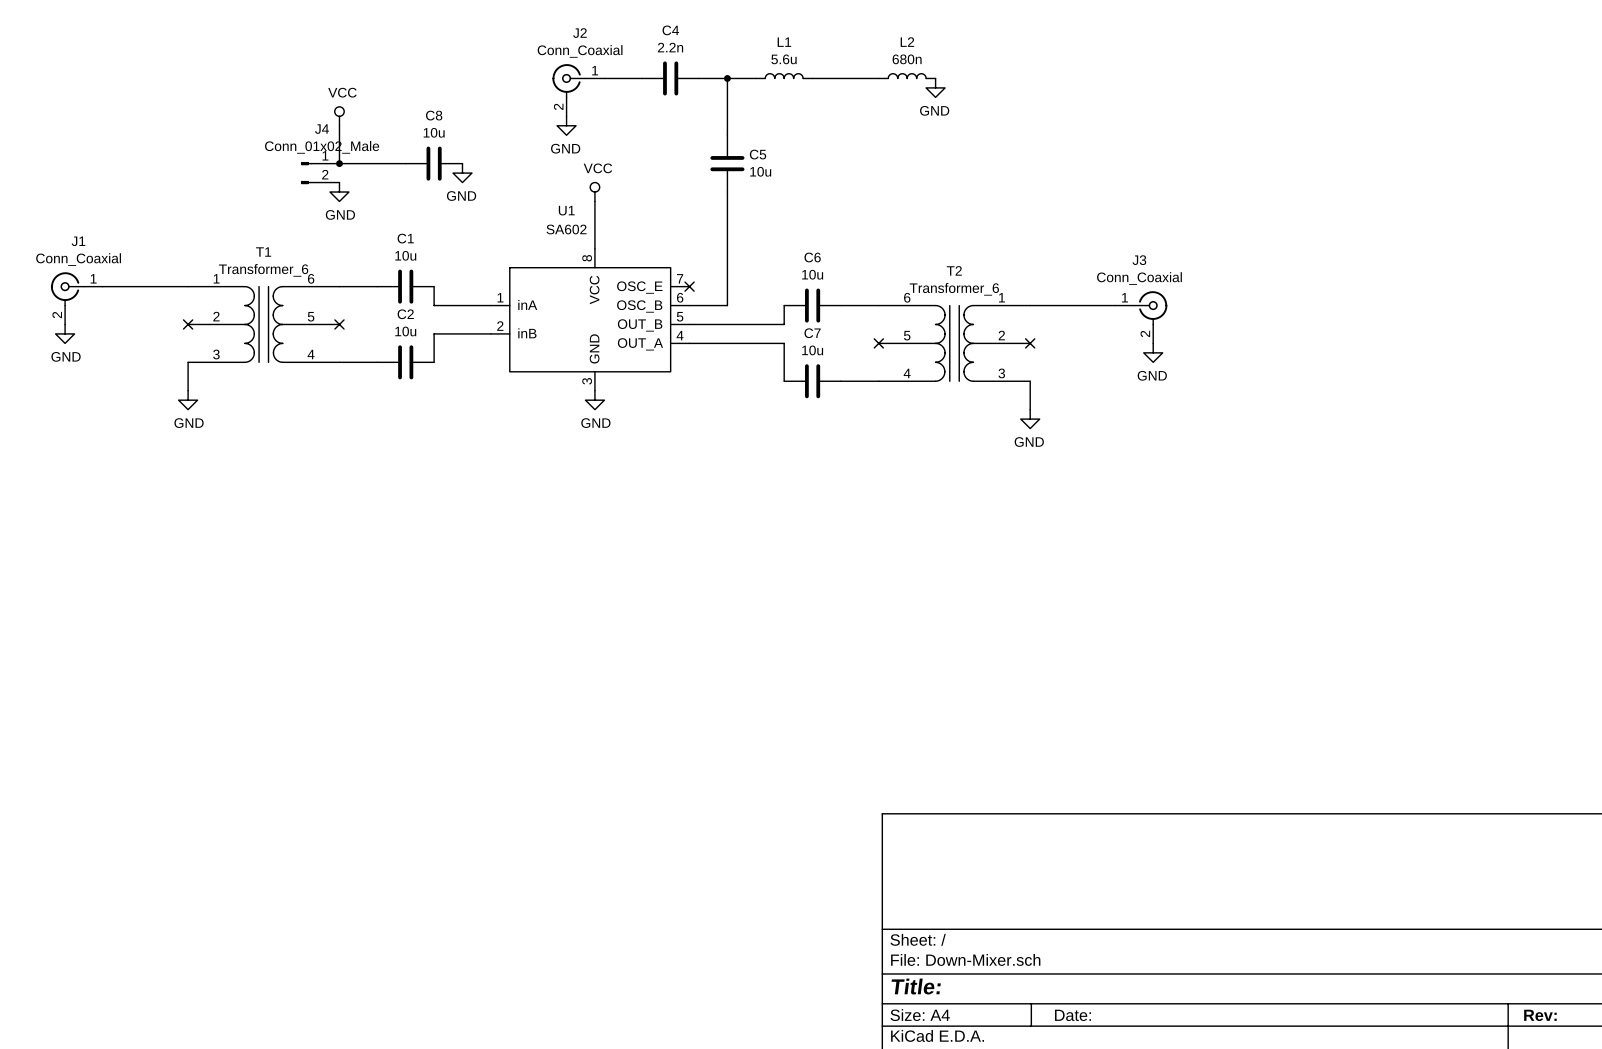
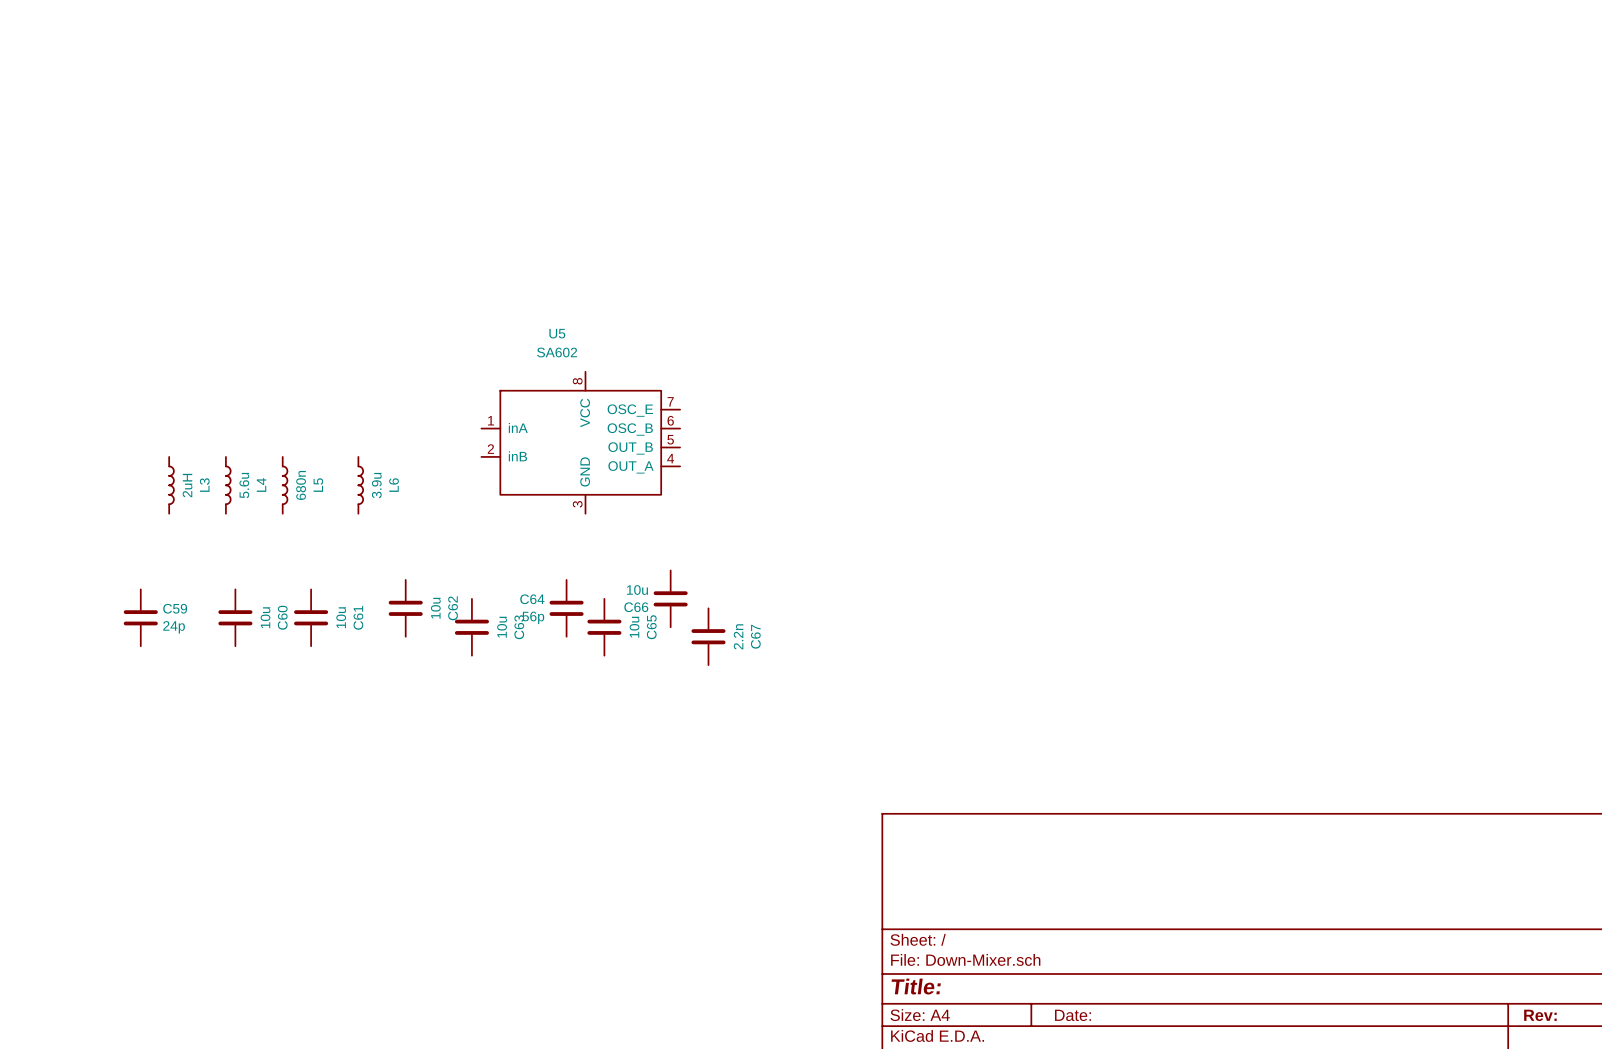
L1: 5.6u (784, 76) -> none
L2: 680n (907, 76) -> none
wire: (604, 78) (642, 78) -> none
C4: 2.2n (670, 78) -> none
wire: (699, 78) (755, 78) -> none
wire: (727, 78) (727, 135) -> none
junction: (727, 78) -> none
wire: (812, 78) (878, 78) -> none
power symbol: GND (935, 87) -> none
J2: Conn_Coaxial (578, 90) -> none
power symbol: VCC (339, 116) -> none
wire: (339, 125) (339, 163) (405, 163) -> none
power symbol: GND (566, 125) -> none
junction: (339, 163) -> none
C8: 10u (434, 163) -> none
C5: 10u (727, 163) -> none
J4: Conn_01x02_Male (320, 173) -> none
power symbol: GND (462, 173) -> none
power symbol: GND (339, 192) -> none
power symbol: VCC (594, 192) -> none
wire: (727, 192) (727, 305) (689, 305) -> none
wire: (594, 201) (594, 248) -> none
wire: (102, 286) (188, 286) -> none
wire: (339, 286) (377, 286) -> none
C1: 10u (405, 286) -> none
wire: (434, 286) (434, 305) (490, 305) -> none
no-connect mark: (689, 286) -> none
J1: Conn_Coaxial (76, 298) -> none
wire: (784, 305) (784, 324) (689, 324) -> none
C6: 10u (812, 305) -> none
wire: (840, 305) (878, 305) -> none
wire: (1030, 305) (1115, 305) -> none
J3: Conn_Coaxial (1141, 317) -> none
U1: SA602 (590, 319) -> none
no-connect mark: (188, 324) -> none
T1: Transformer_6 (263, 324) -> none
no-connect mark: (339, 324) -> none
power symbol: GND (65, 333) -> none
wire: (490, 333) (434, 333) (434, 362) -> none
wire: (689, 343) (784, 343) (784, 381) -> none
no-connect mark: (878, 343) -> none
T2: Transformer_6 (954, 343) -> none
no-connect mark: (1030, 343) -> none
power symbol: GND (1153, 352) -> none
wire: (188, 362) (188, 390) -> none
wire: (339, 362) (377, 362) -> none
C2: 10u (405, 362) -> none
C7: 10u (812, 381) -> none
wire: (840, 381) (878, 381) -> none
wire: (1030, 381) (1030, 409) -> none
power symbol: GND (188, 400) -> none
power symbol: GND (594, 400) -> none
power symbol: GND (1030, 419) -> none
U5: none -> SA602 (580, 442)
L3: none -> 2uH (171, 485)
L4: none -> 5.6u (228, 485)
L5: none -> 680n (285, 485)
L6: none -> 3.9u (360, 485)
C66: none -> 10u (670, 598)
C62: none -> 10u (405, 608)
C64: none -> 56p (566, 608)
C59: none -> 24p (140, 617)
C60: none -> 10u (235, 617)
C61: none -> 10u (311, 617)
C63: none -> 10u (471, 627)
C65: none -> 10u (604, 627)
C67: none -> 2.2n (708, 636)

